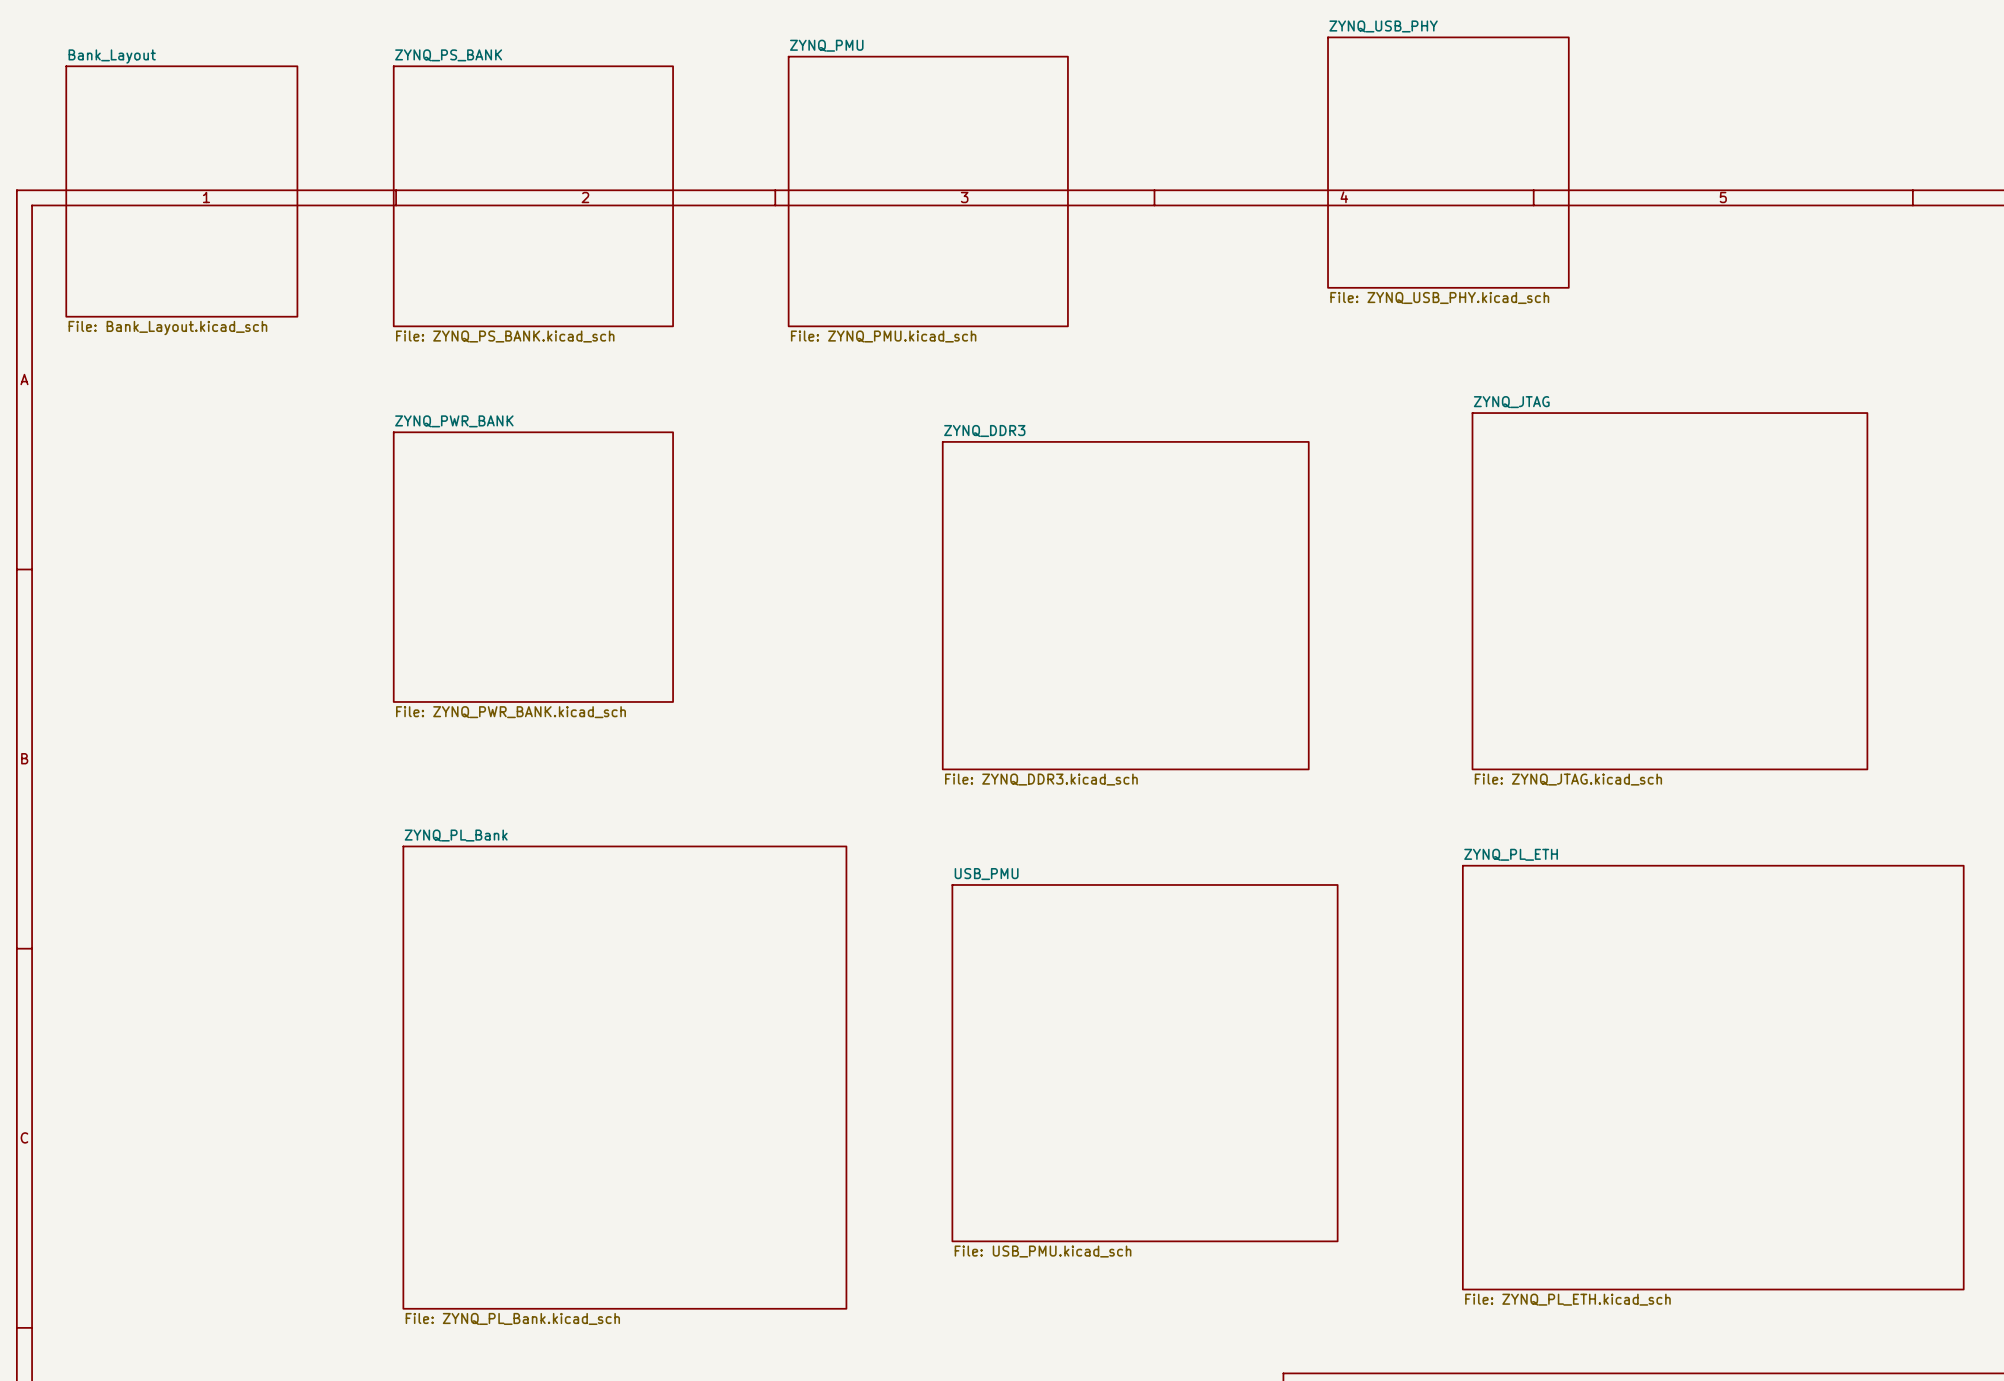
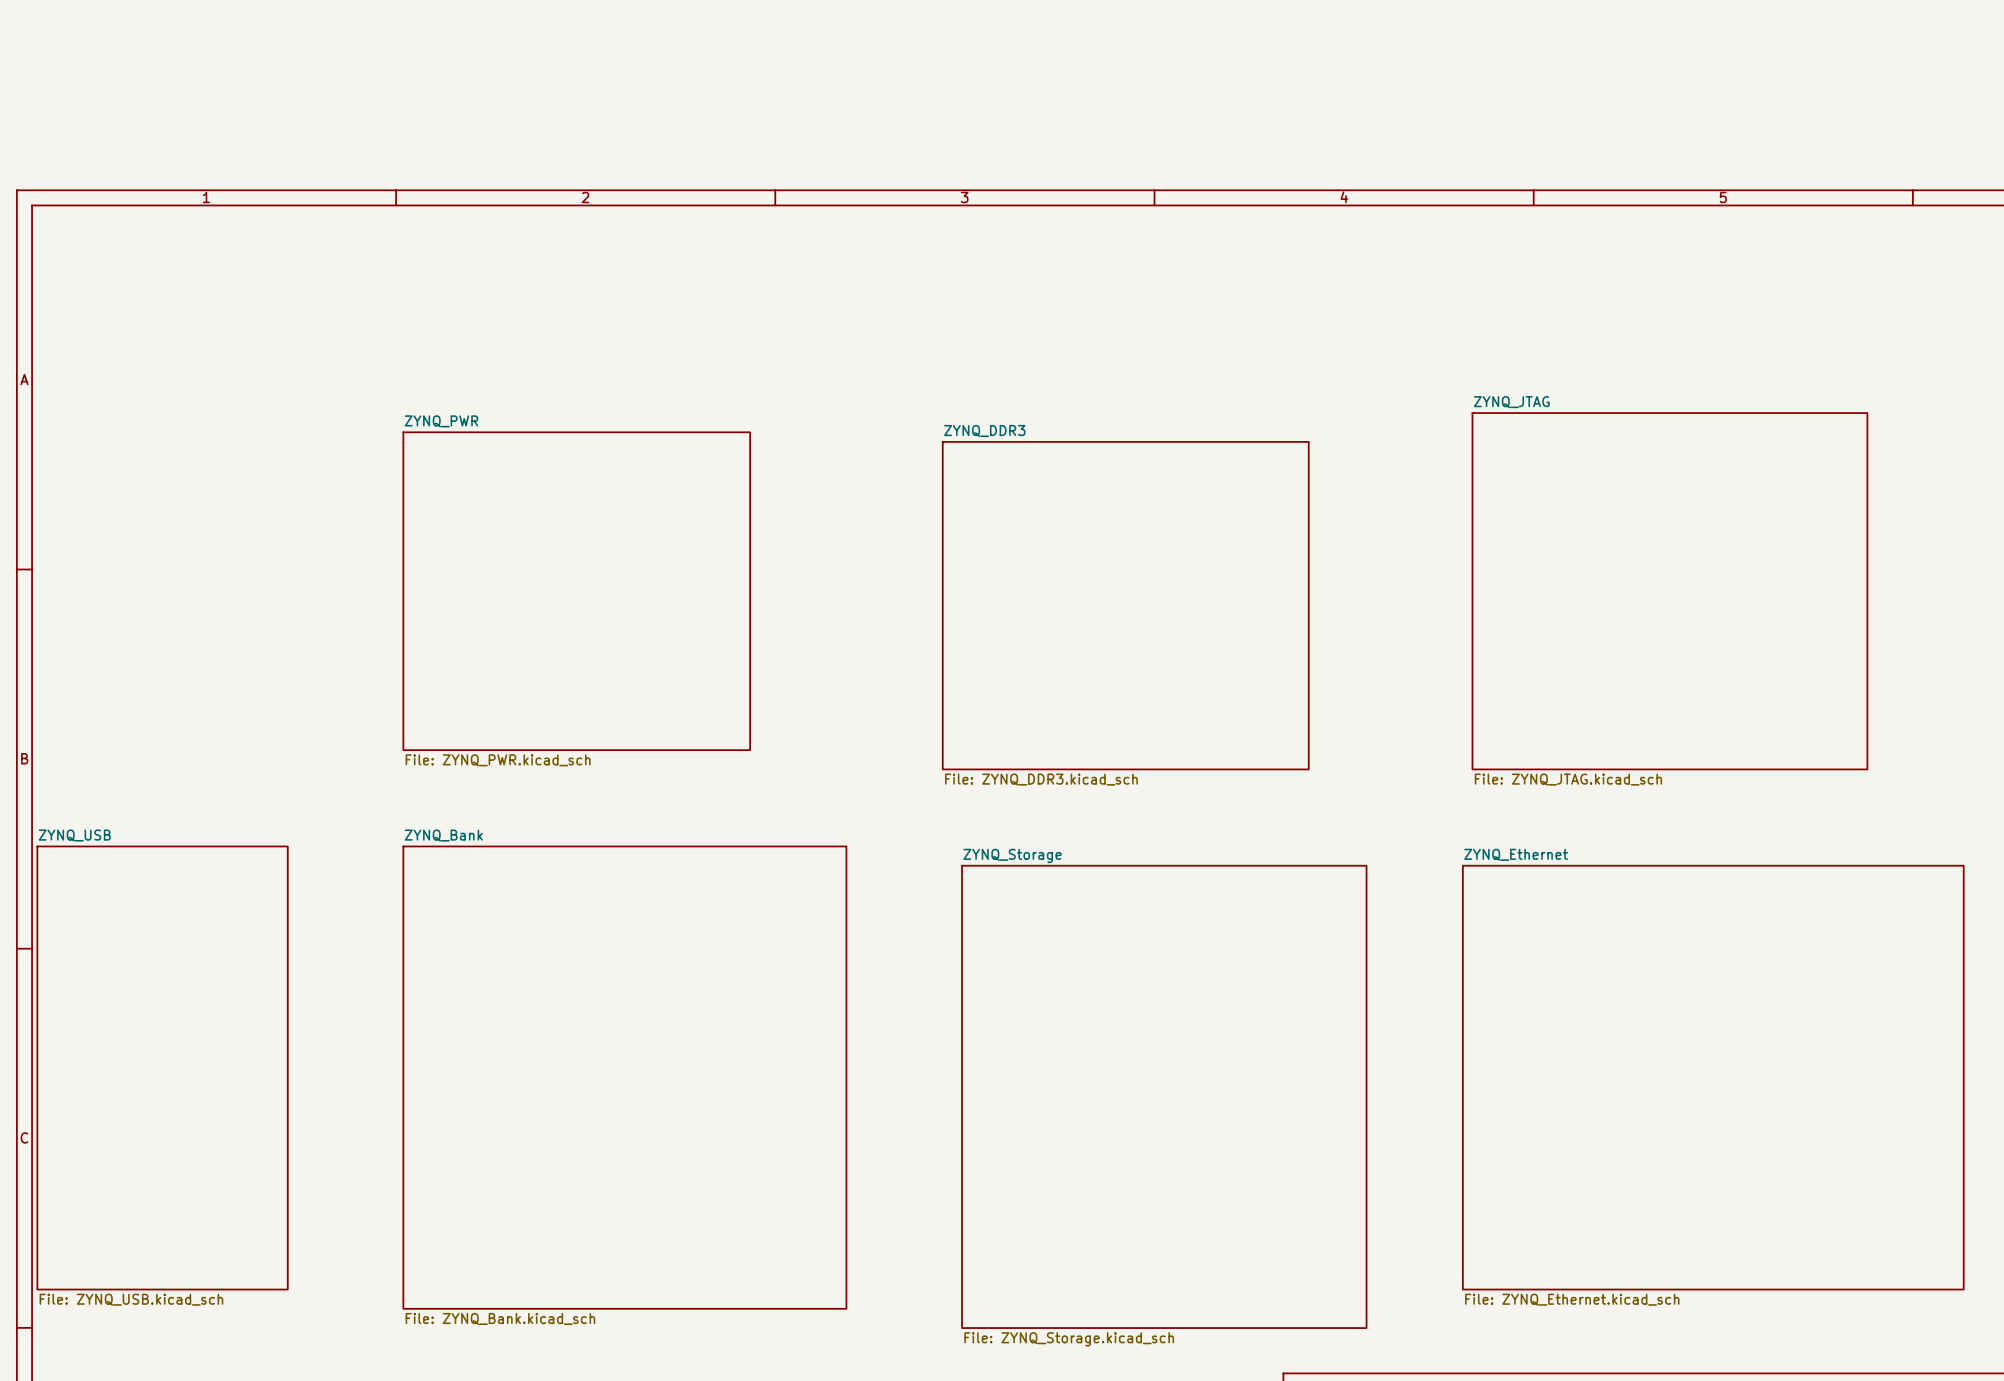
sheet ZYNQ_USB_PHY: File: ZYNQ_USB_PHY.kicad_sch (1448, 162) -> none
sheet Bank_Layout: File: Bank_Layout.kicad_sch (181, 191) -> none
sheet ZYNQ_PMU: File: ZYNQ_PMU.kicad_sch (928, 191) -> none
sheet ZYNQ_PS_BANK: File: ZYNQ_PS_BANK.kicad_sch (533, 196) -> none
sheet ZYNQ_PWR_BANK: File: ZYNQ_PWR_BANK.kicad_sch (533, 567) -> none
sheet ZYNQ_PWR: none -> File: ZYNQ_PWR.kicad_sch (576, 591)
sheet ZYNQ_PL_Bank name: ZYNQ_PL_Bank (456, 835) -> ZYNQ_Bank (443, 835)
sheet ZYNQ_PL_ETH name: ZYNQ_PL_ETH (1511, 854) -> ZYNQ_Ethernet (1516, 854)
sheet USB_PMU: File: USB_PMU.kicad_sch (1145, 1063) -> none
sheet ZYNQ_USB: none -> File: ZYNQ_USB.kicad_sch (162, 1067)
sheet ZYNQ_Storage: none -> File: ZYNQ_Storage.kicad_sch (1164, 1096)
sheet ZYNQ_PL_ETH value: File: ZYNQ_PL_ETH.kicad_sch (1567, 1299) -> File: ZYNQ_Ethernet.kicad_sch (1572, 1299)
sheet ZYNQ_PL_Bank value: File: ZYNQ_PL_Bank.kicad_sch (512, 1318) -> File: ZYNQ_Bank.kicad_sch (500, 1318)

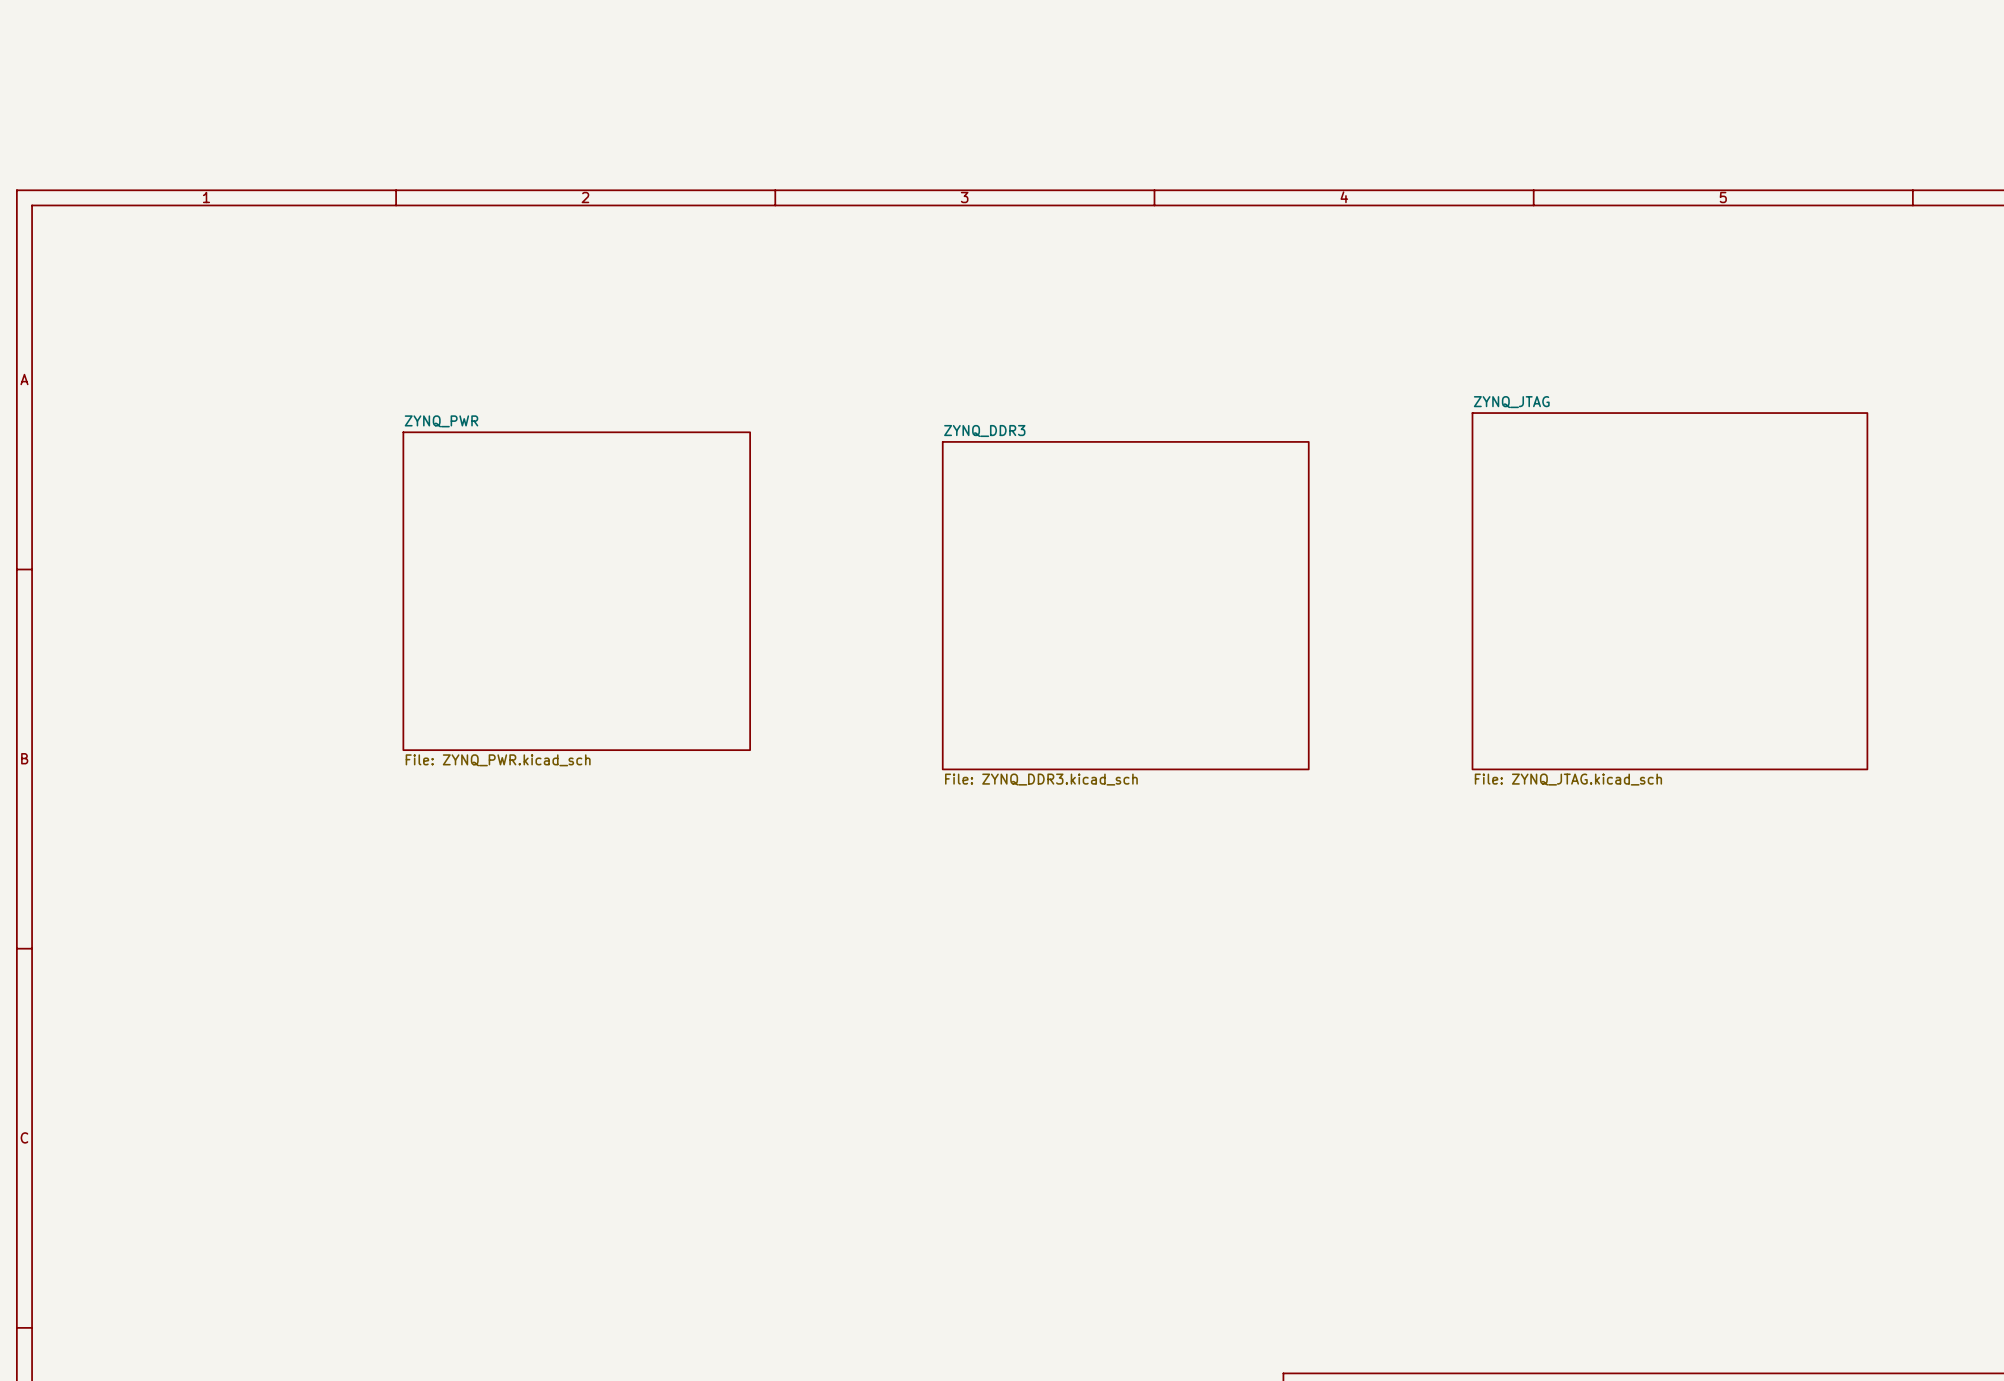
sheet ZYNQ_USB: File: ZYNQ_USB.kicad_sch (162, 1067) -> none
sheet ZYNQ_Bank: File: ZYNQ_Bank.kicad_sch (624, 1077) -> none
sheet ZYNQ_Ethernet: File: ZYNQ_Ethernet.kicad_sch (1713, 1077) -> none
sheet ZYNQ_Storage: File: ZYNQ_Storage.kicad_sch (1164, 1096) -> none

